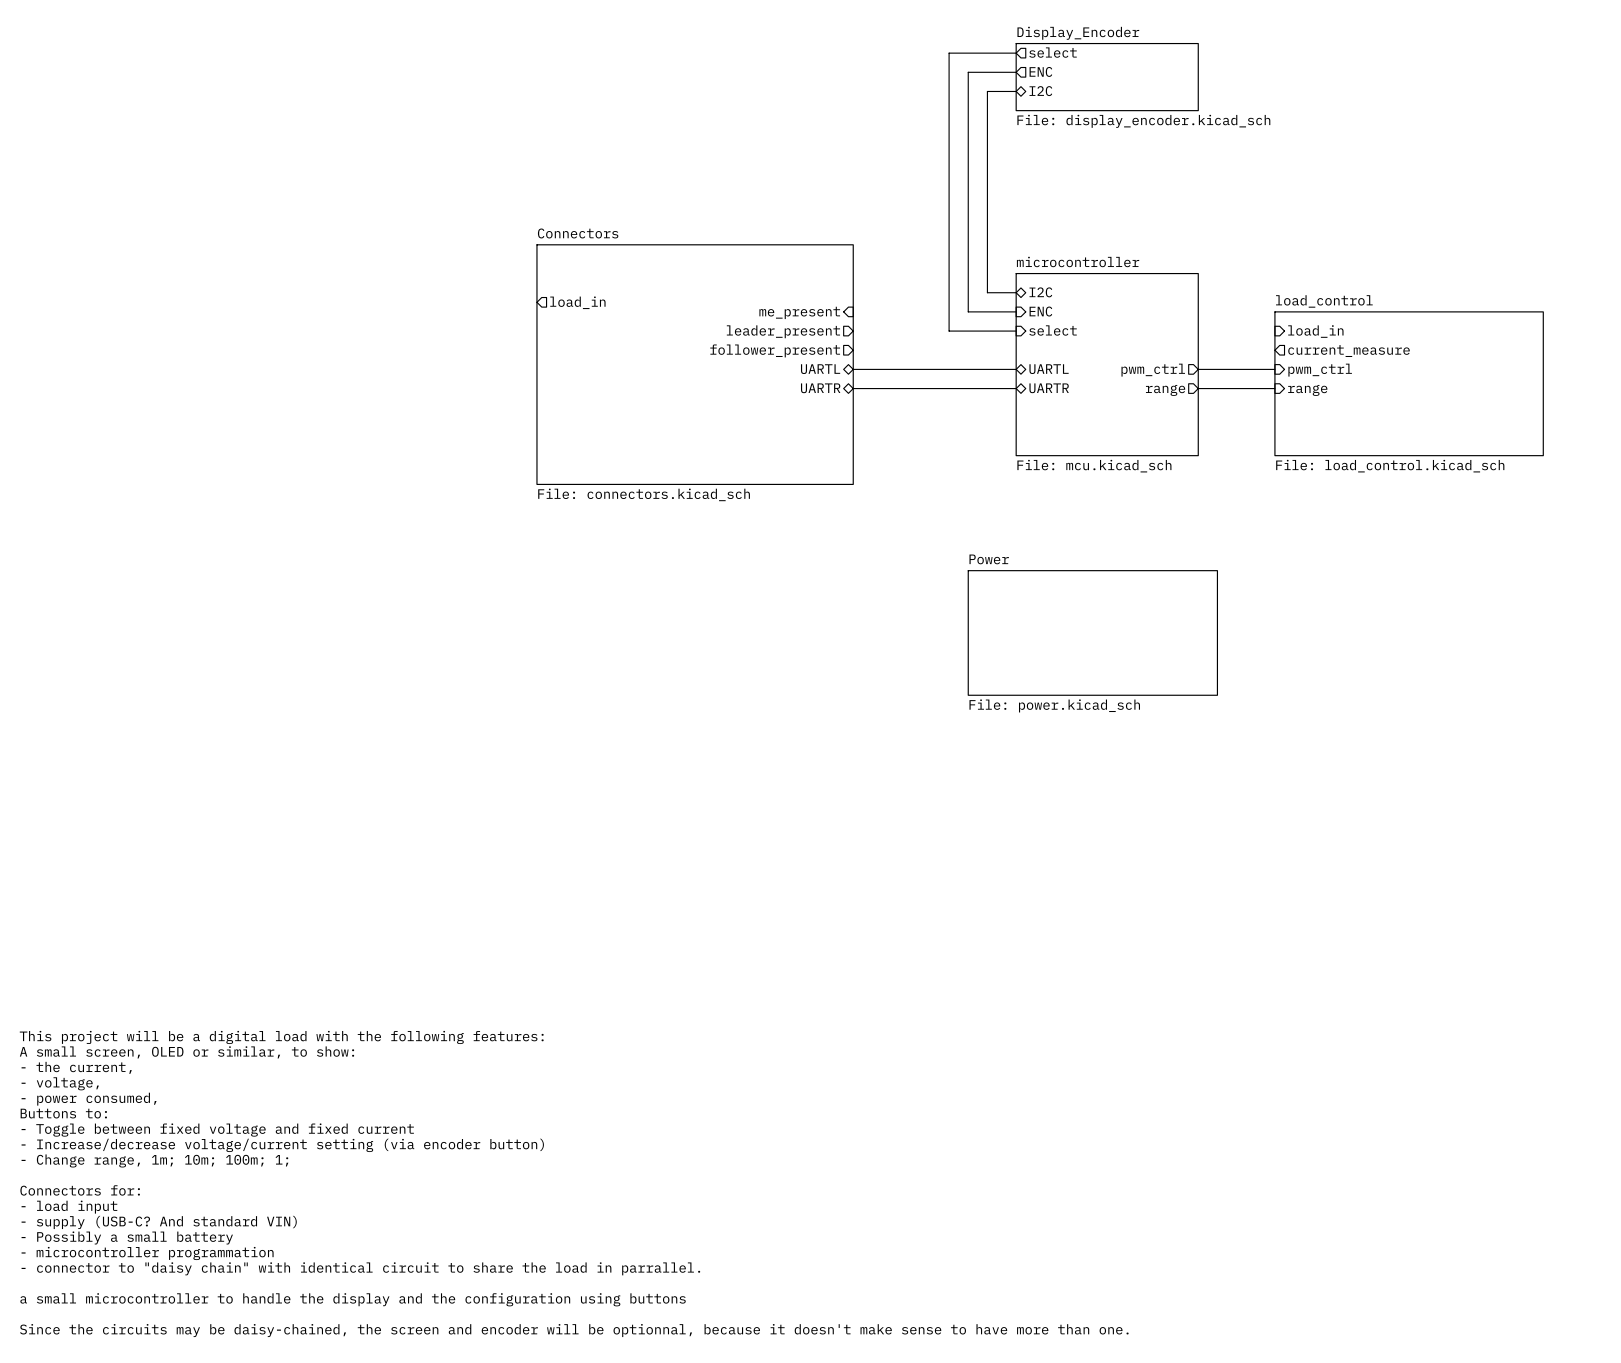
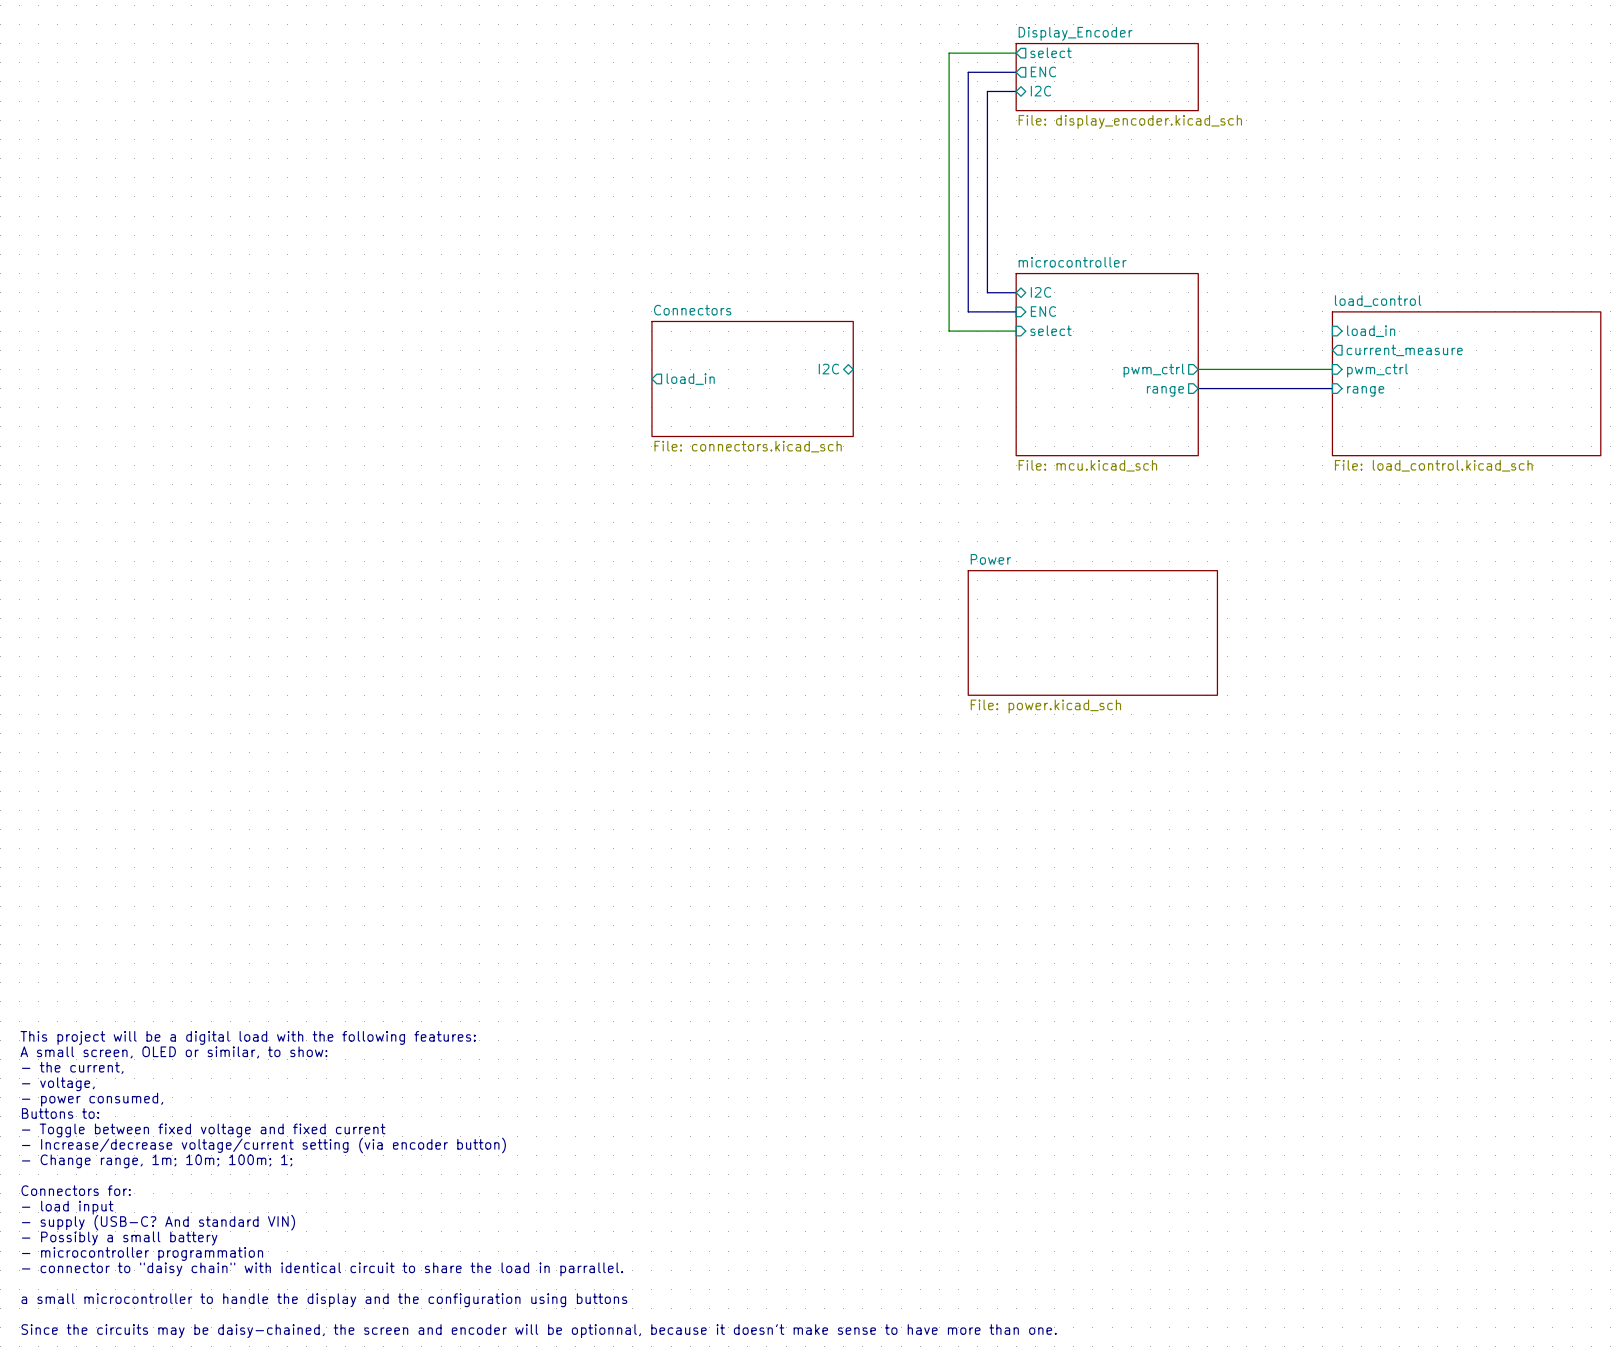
sheet pin position: load_in (577, 302) -> load_in (690, 379)
sheet pin: me_present (799, 312) -> none
sheet pin: leader_present (783, 331) -> none
sheet pin position: load_in (1315, 331) -> load_in (1371, 331)
sheet pin: follower_present (775, 350) -> none
sheet pin position: current_measure (1349, 351) -> current_measure (1404, 350)
sheet Connectors: File: connectors.kicad_sch (695, 364) -> none
sheet pin: UARTL (820, 369) -> I2C (828, 369)
bus: (853, 369) (1016, 369) -> none
sheet pin: UARTL (1049, 369) -> none
wire: none -> (1274, 369) (1332, 369)
sheet pin position: pwm_ctrl (1320, 370) -> pwm_ctrl (1377, 370)
sheet Connectors: none -> File: connectors.kicad_sch (752, 378)
sheet load_control position: (1409, 383) -> (1466, 383)
sheet pin: UARTR (820, 388) -> none
bus: (853, 388) (1016, 388) -> none
sheet pin: UARTR (1049, 388) -> none
bus: none -> (1274, 388) (1332, 388)
sheet pin position: range (1307, 390) -> range (1365, 391)

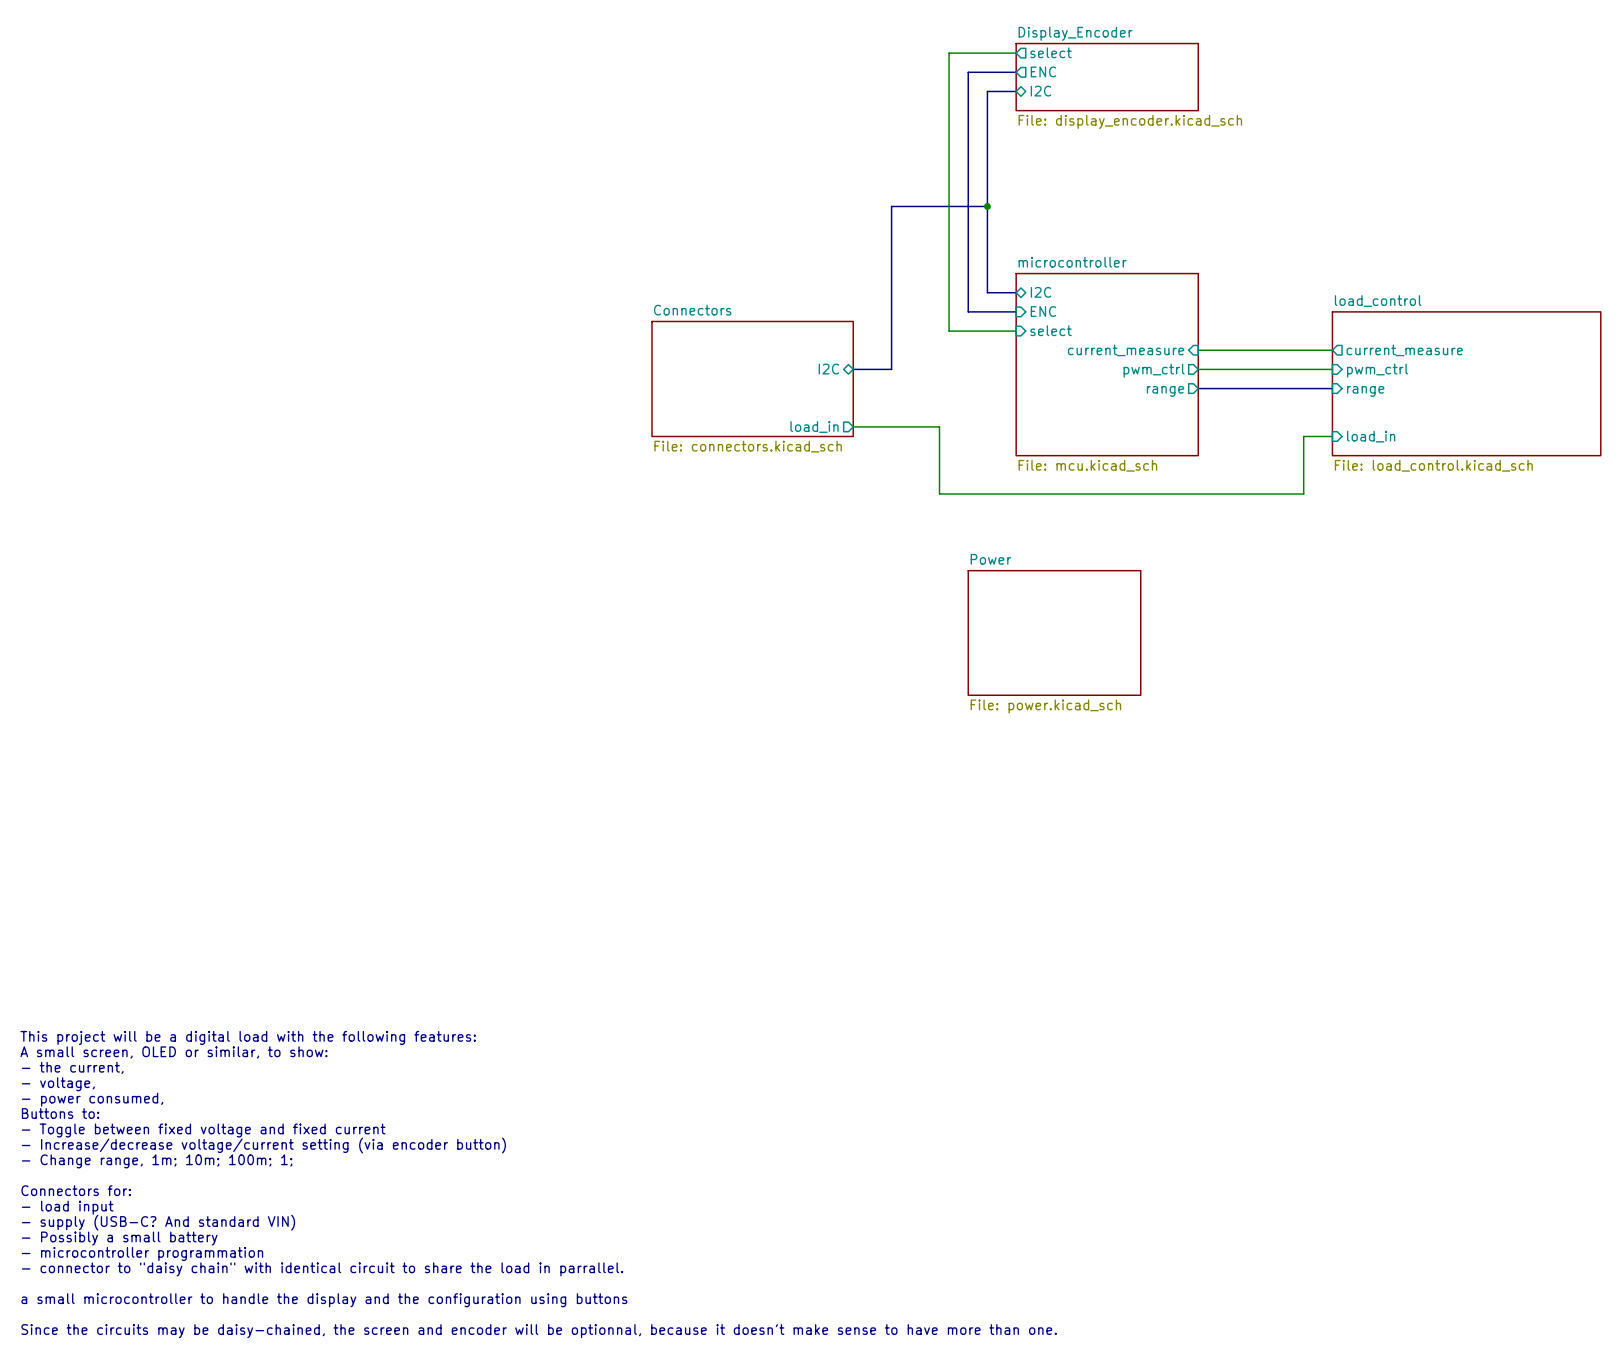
bus: none -> (987, 206) (891, 206) (891, 369) (853, 369)
junction: none -> (987, 206)
sheet pin position: load_in (1371, 331) -> load_in (1371, 436)
sheet pin: none -> current_measure (1126, 350)
wire: none -> (1198, 350) (1332, 350)
sheet pin rotation: 0° (690, 379) -> 180° (814, 427)
sheet pin position: load_in (690, 379) -> load_in (814, 427)
wire: none -> (853, 426) (939, 426) (939, 493) (1303, 493) (1303, 436) (1332, 436)
sheet Power: none -> File: power.kicad_sch (1054, 632)
sheet Power: File: power.kicad_sch (1092, 632) -> none

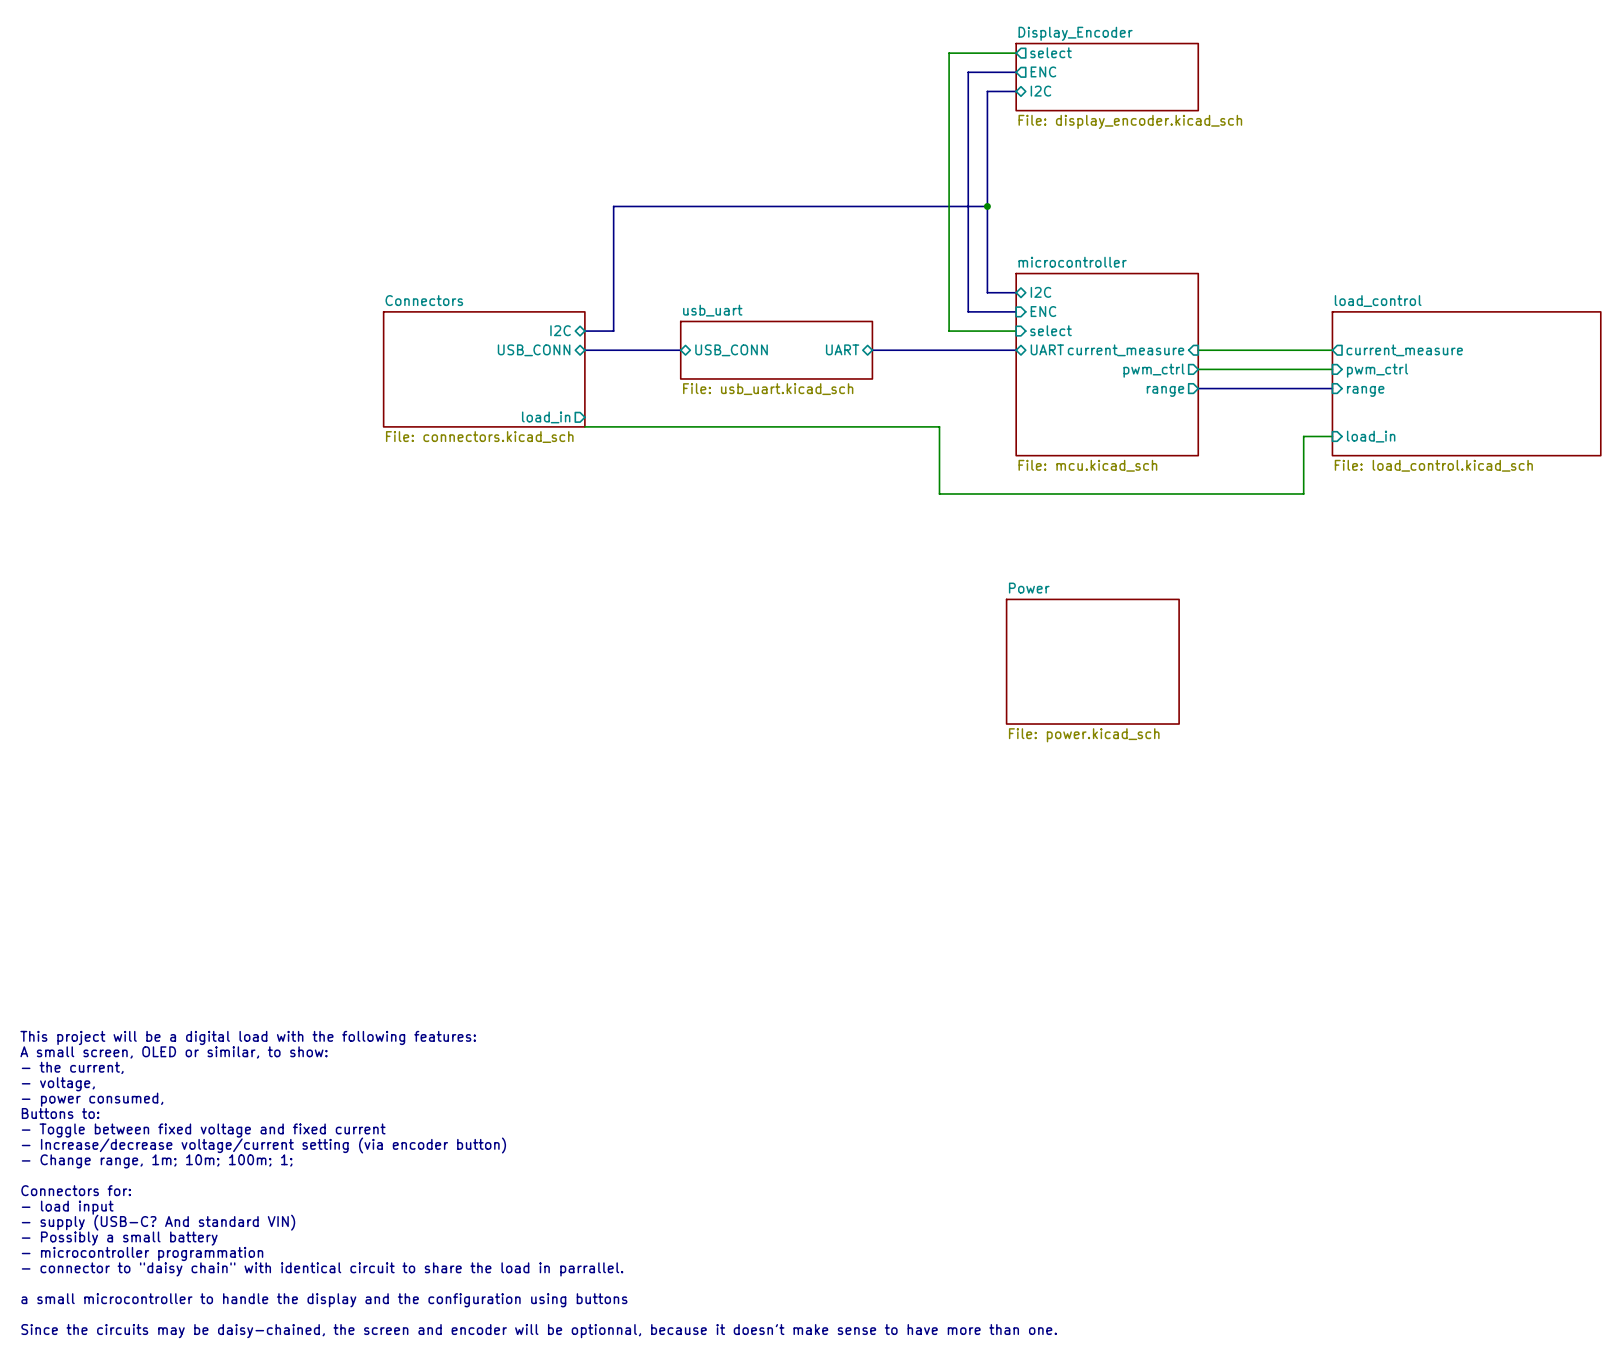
bus: (891, 206) (891, 369) (853, 369) -> (891, 206) (613, 206) (613, 331) (584, 331)
sheet pin: none -> I2C (560, 330)
sheet pin: none -> UART (842, 349)
sheet pin: none -> UART (1047, 349)
sheet pin: none -> USB_CONN (534, 350)
bus: none -> (584, 350) (680, 350)
sheet pin: none -> USB_CONN (731, 350)
sheet usb_uart: none -> File: usb_uart.kicad_sch (776, 350)
bus: none -> (872, 350) (1016, 350)
sheet Connectors: none -> File: connectors.kicad_sch (484, 369)
sheet pin: I2C (828, 369) -> none
sheet Connectors: File: connectors.kicad_sch (752, 378) -> none
sheet pin: none -> load_in (546, 417)
wire: none -> (584, 426) (853, 426)
sheet pin: load_in (814, 427) -> none
sheet Power position: (1054, 632) -> (1092, 661)

